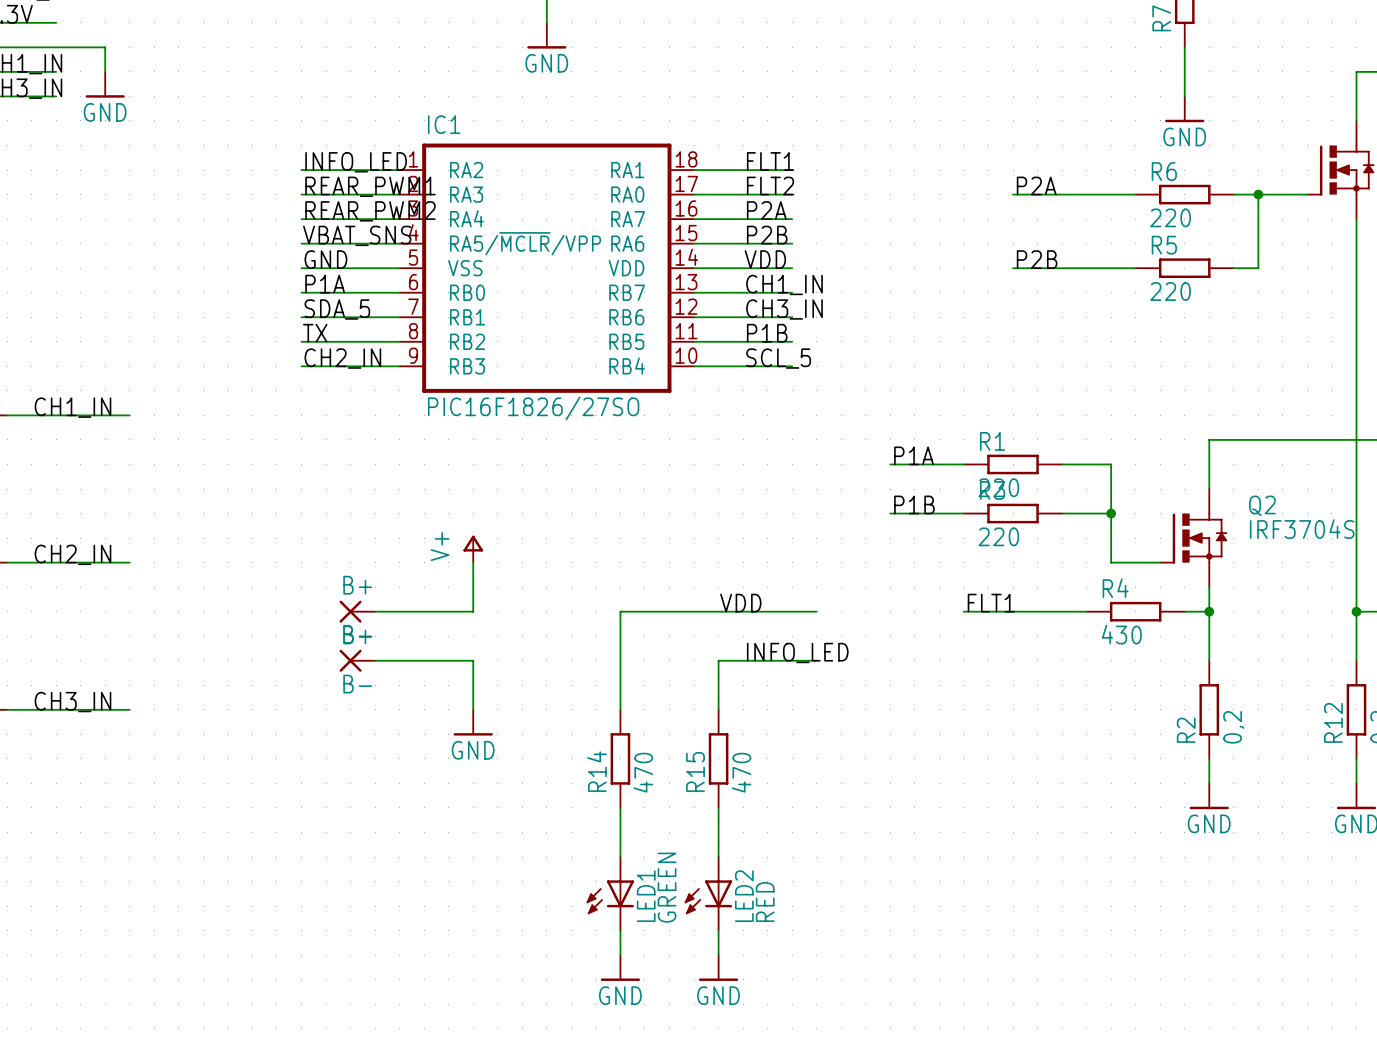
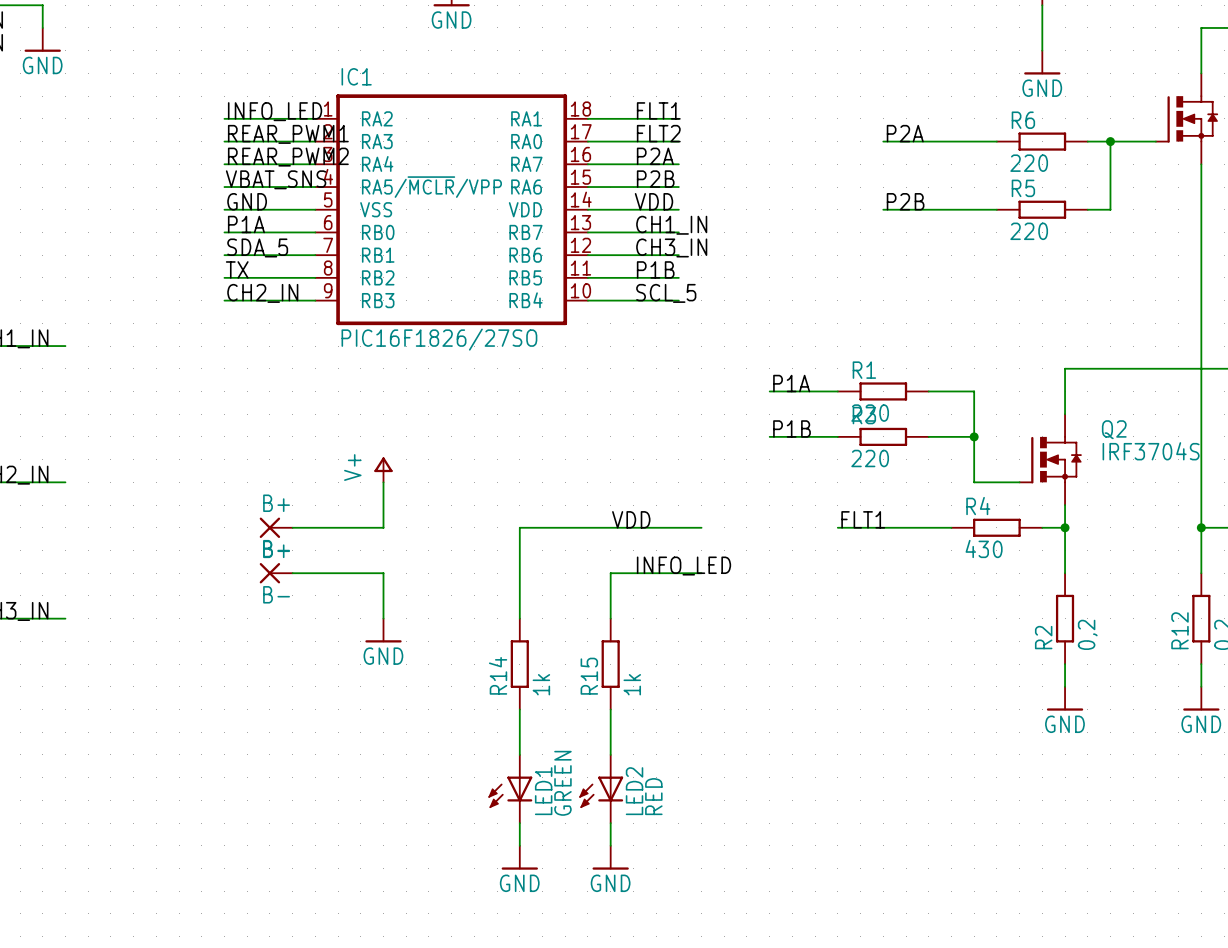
R14 value: 470 (643, 772) -> 1k (541, 684)
R15 value: 470 (741, 772) -> 1k (632, 684)

